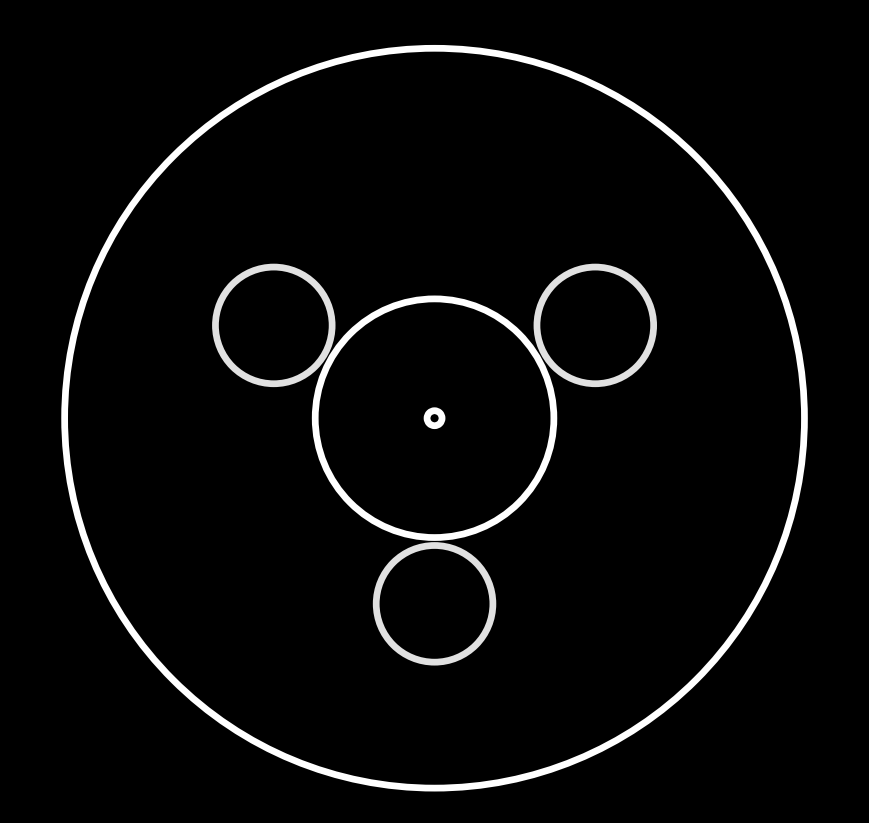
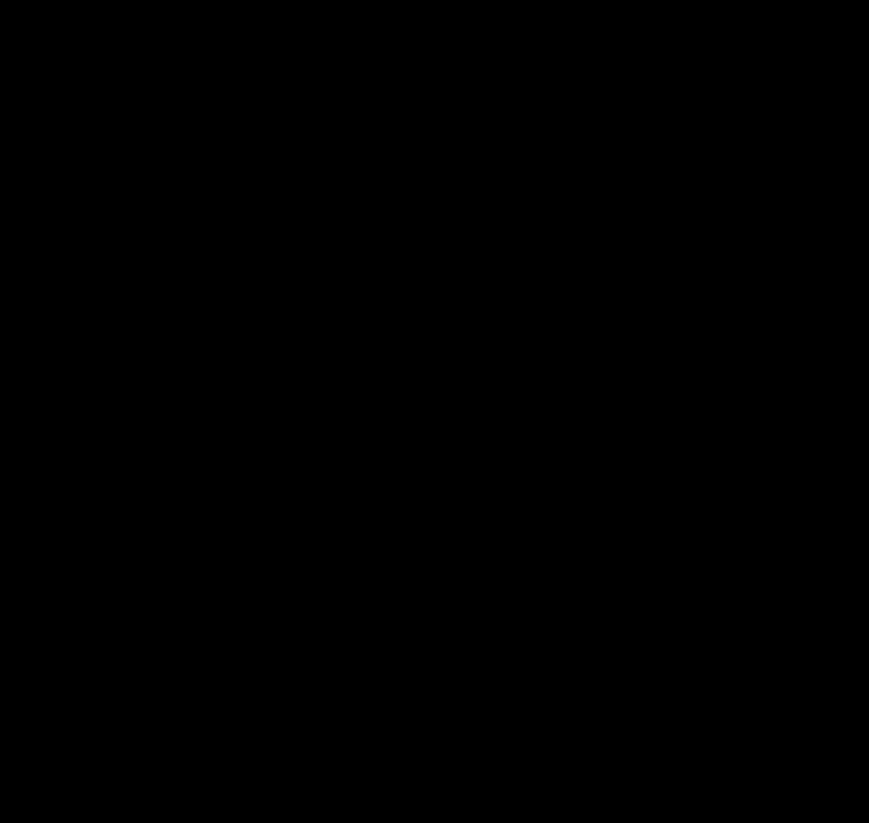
round board edge: [61, 44, 808, 792] -> none
drawing: [212, 263, 336, 388] -> none
drawing: [533, 263, 658, 388] -> none
round board edge: [311, 295, 558, 541] -> none
round board edge: [423, 407, 446, 430] -> none
drawing: [372, 542, 497, 666] -> none

